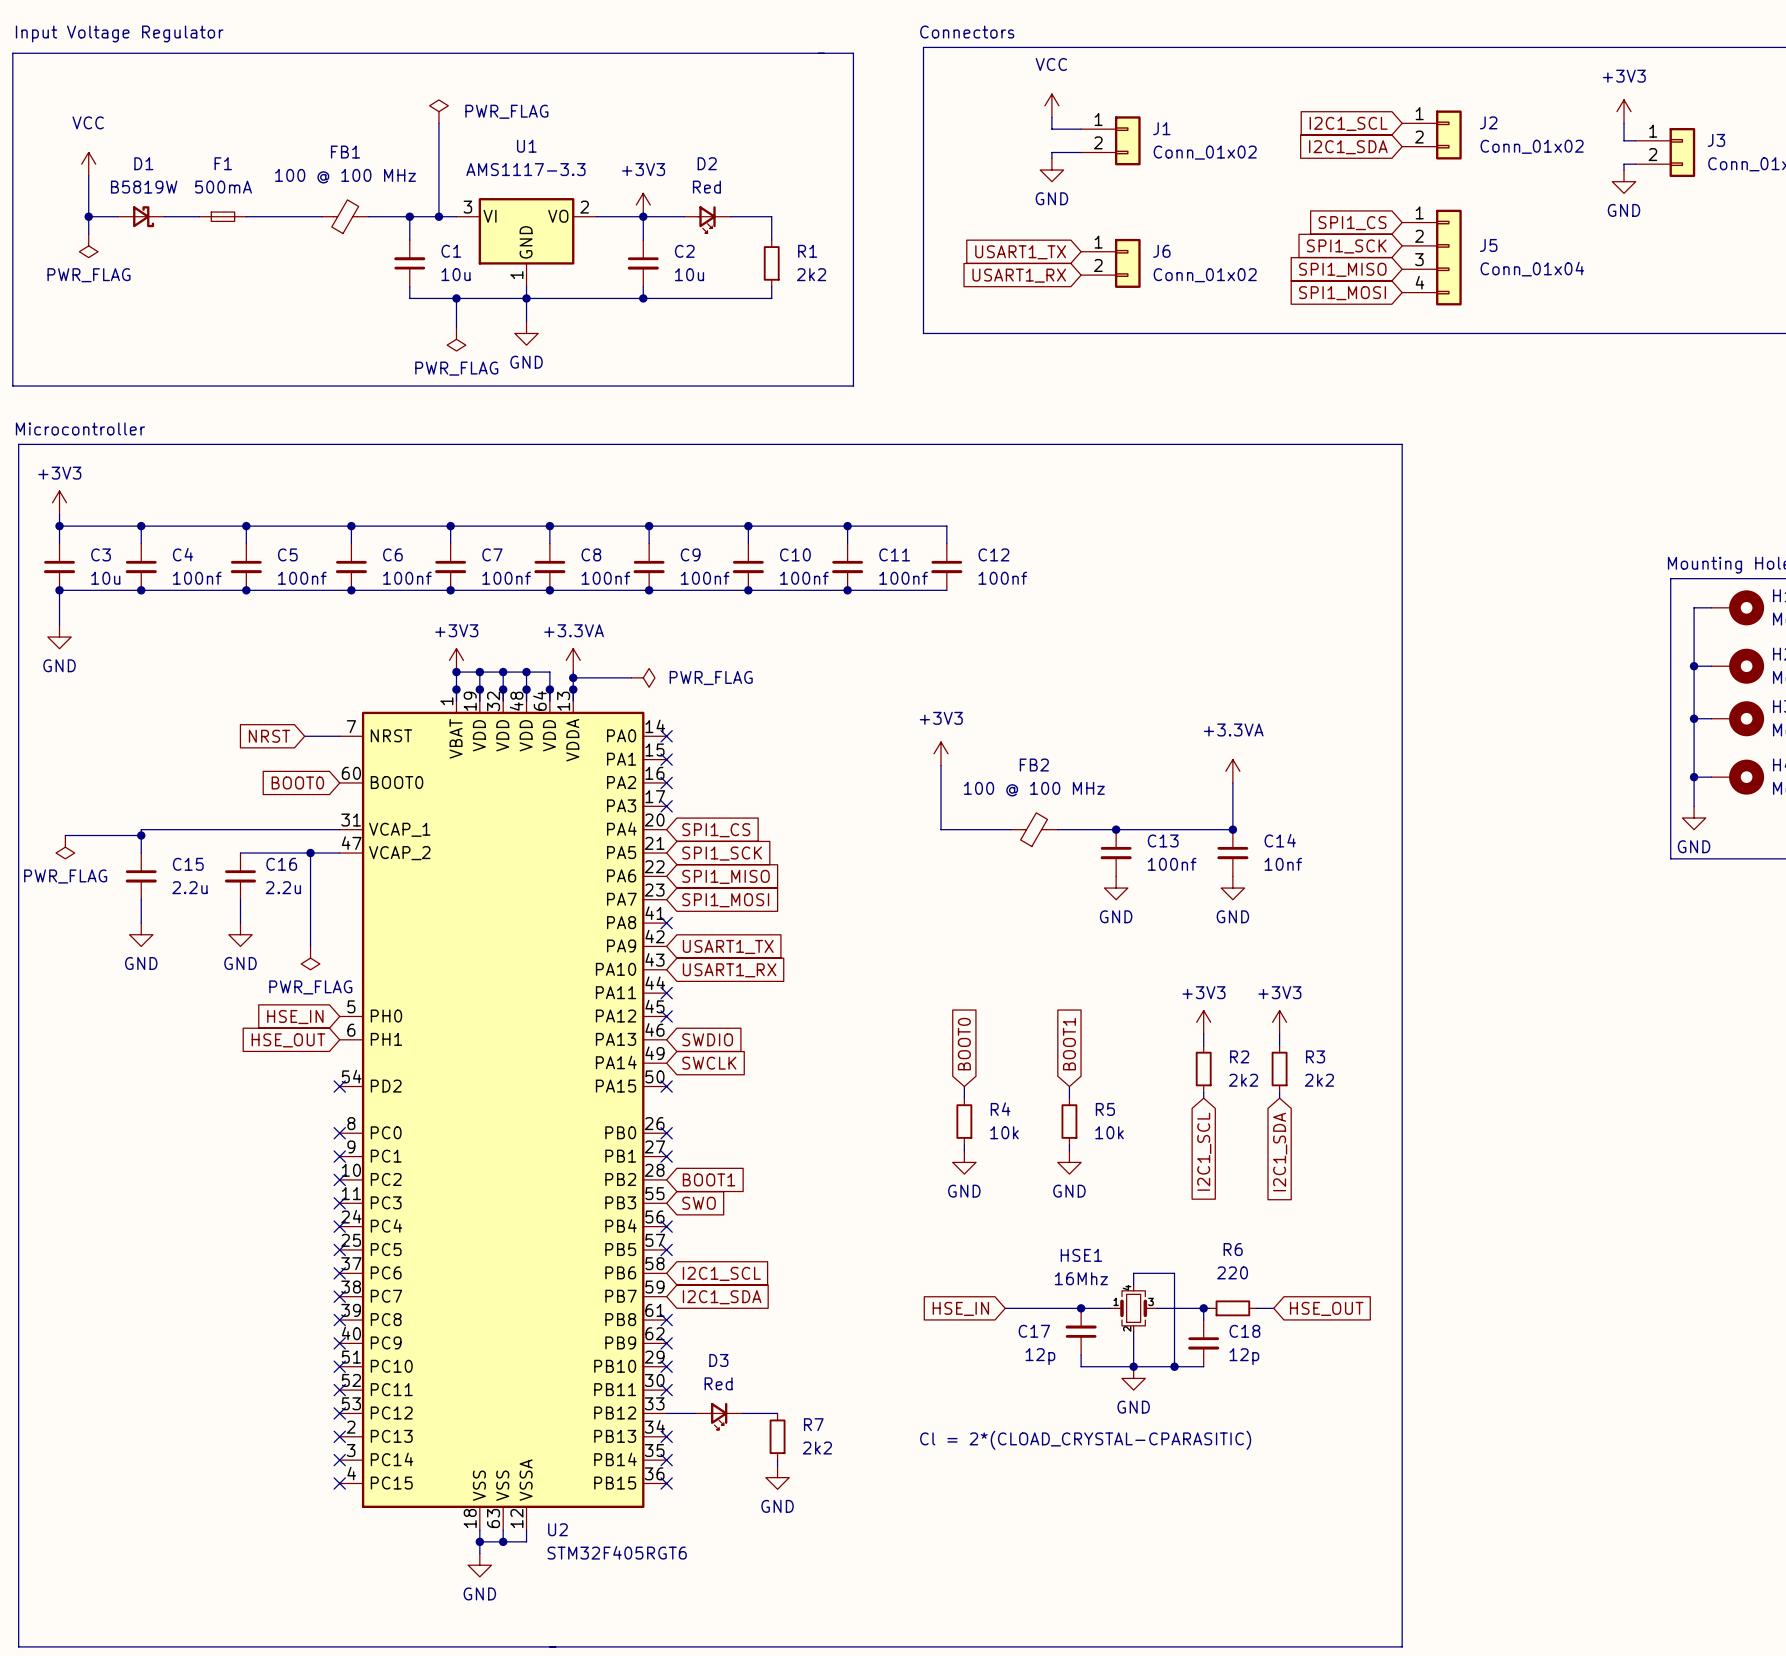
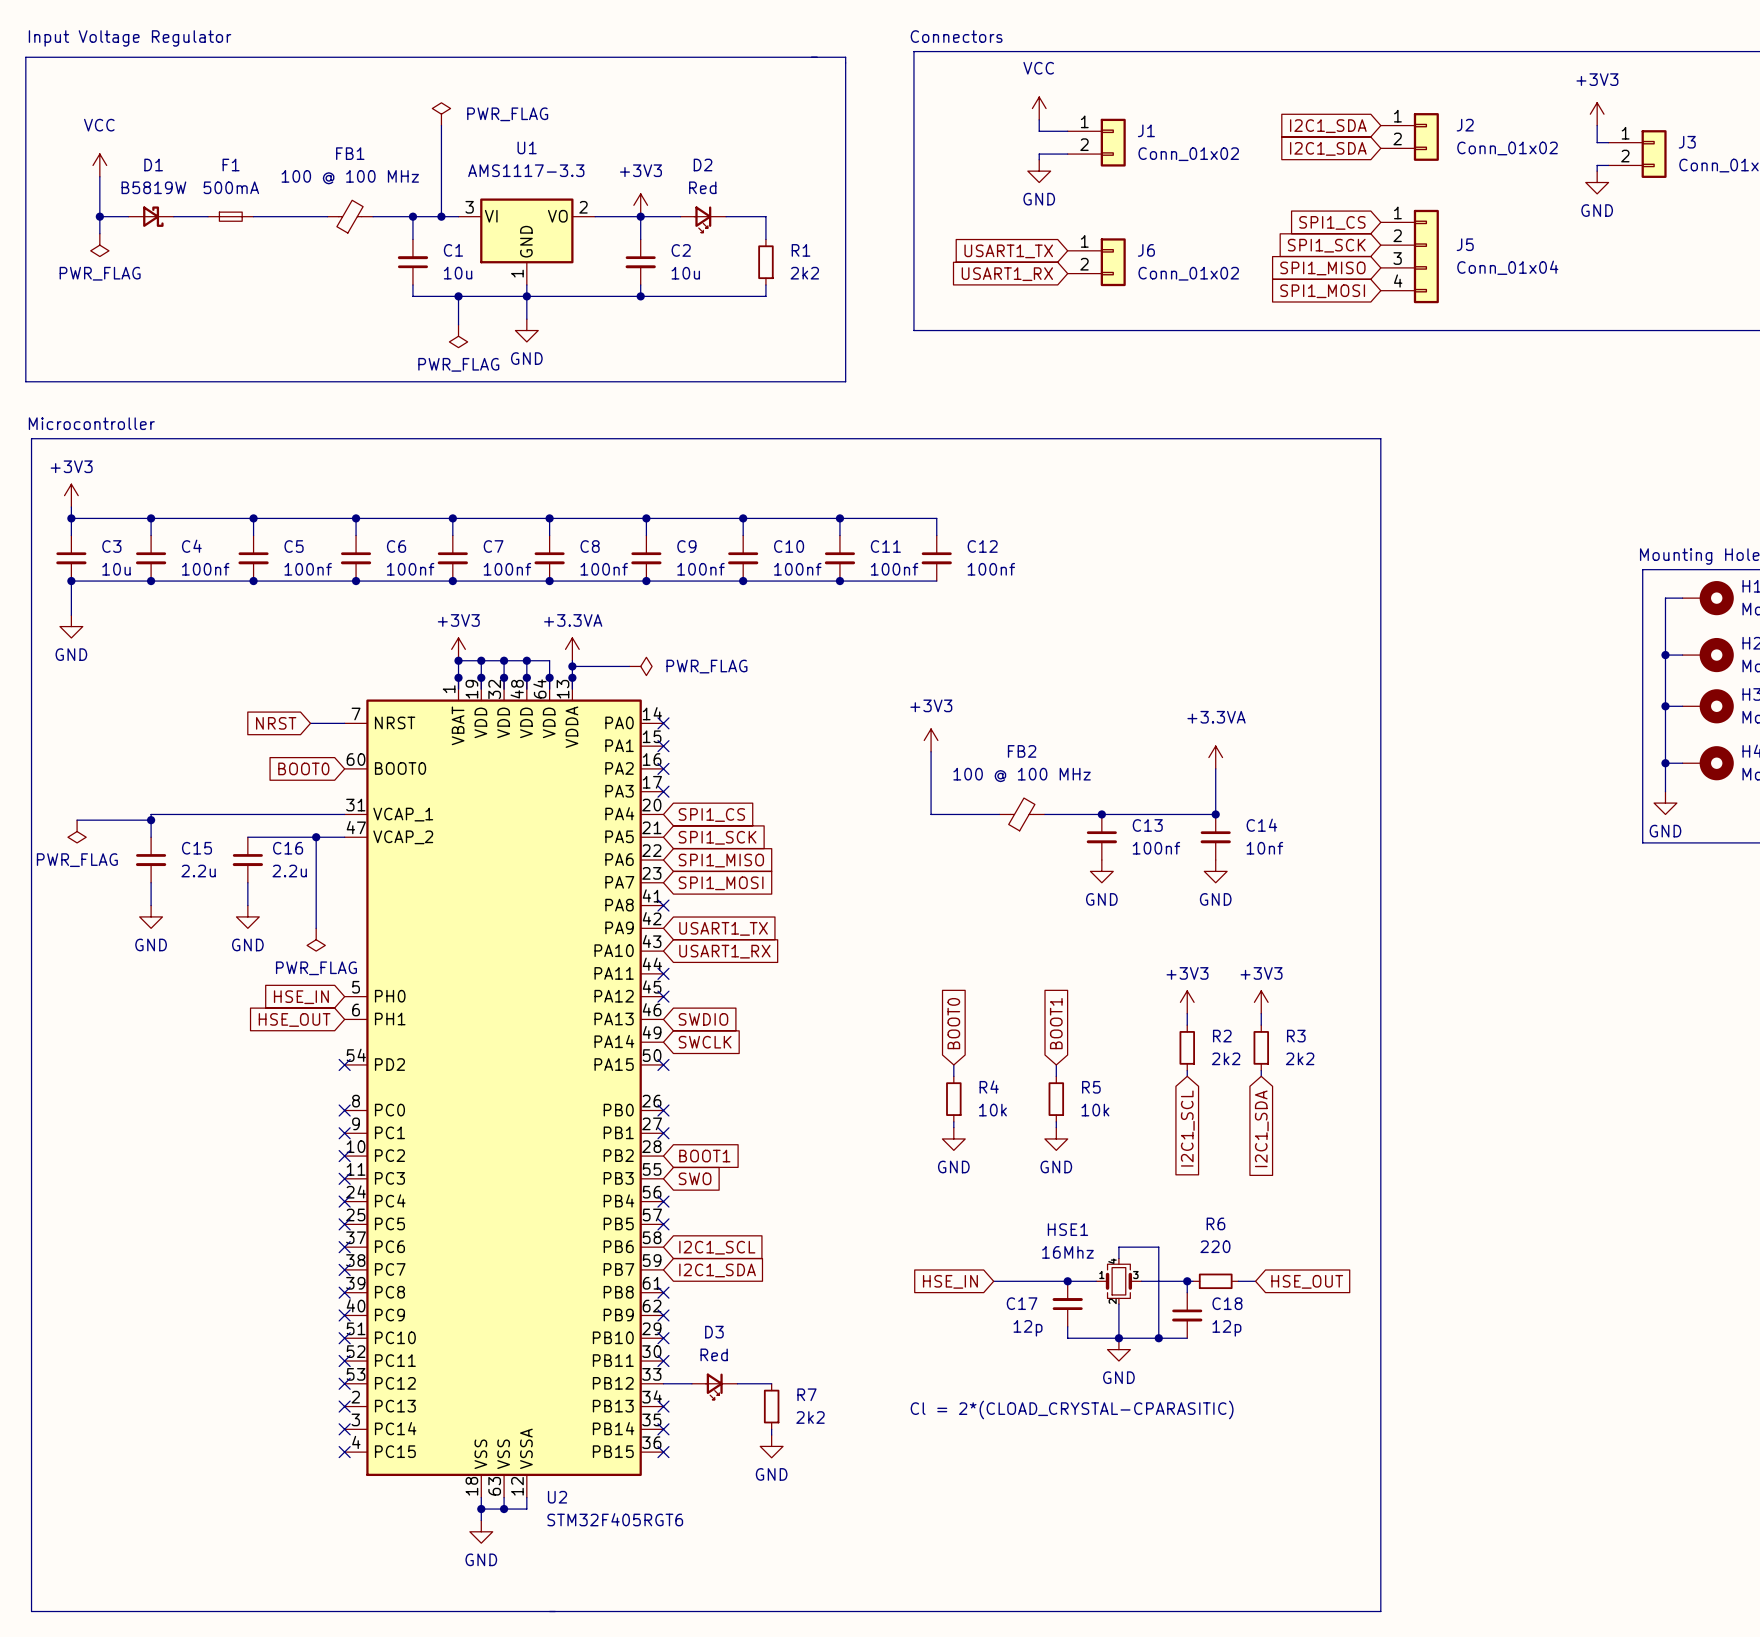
global label: I2C1_SCL (1348, 123) -> I2C1_SDA (1328, 126)

